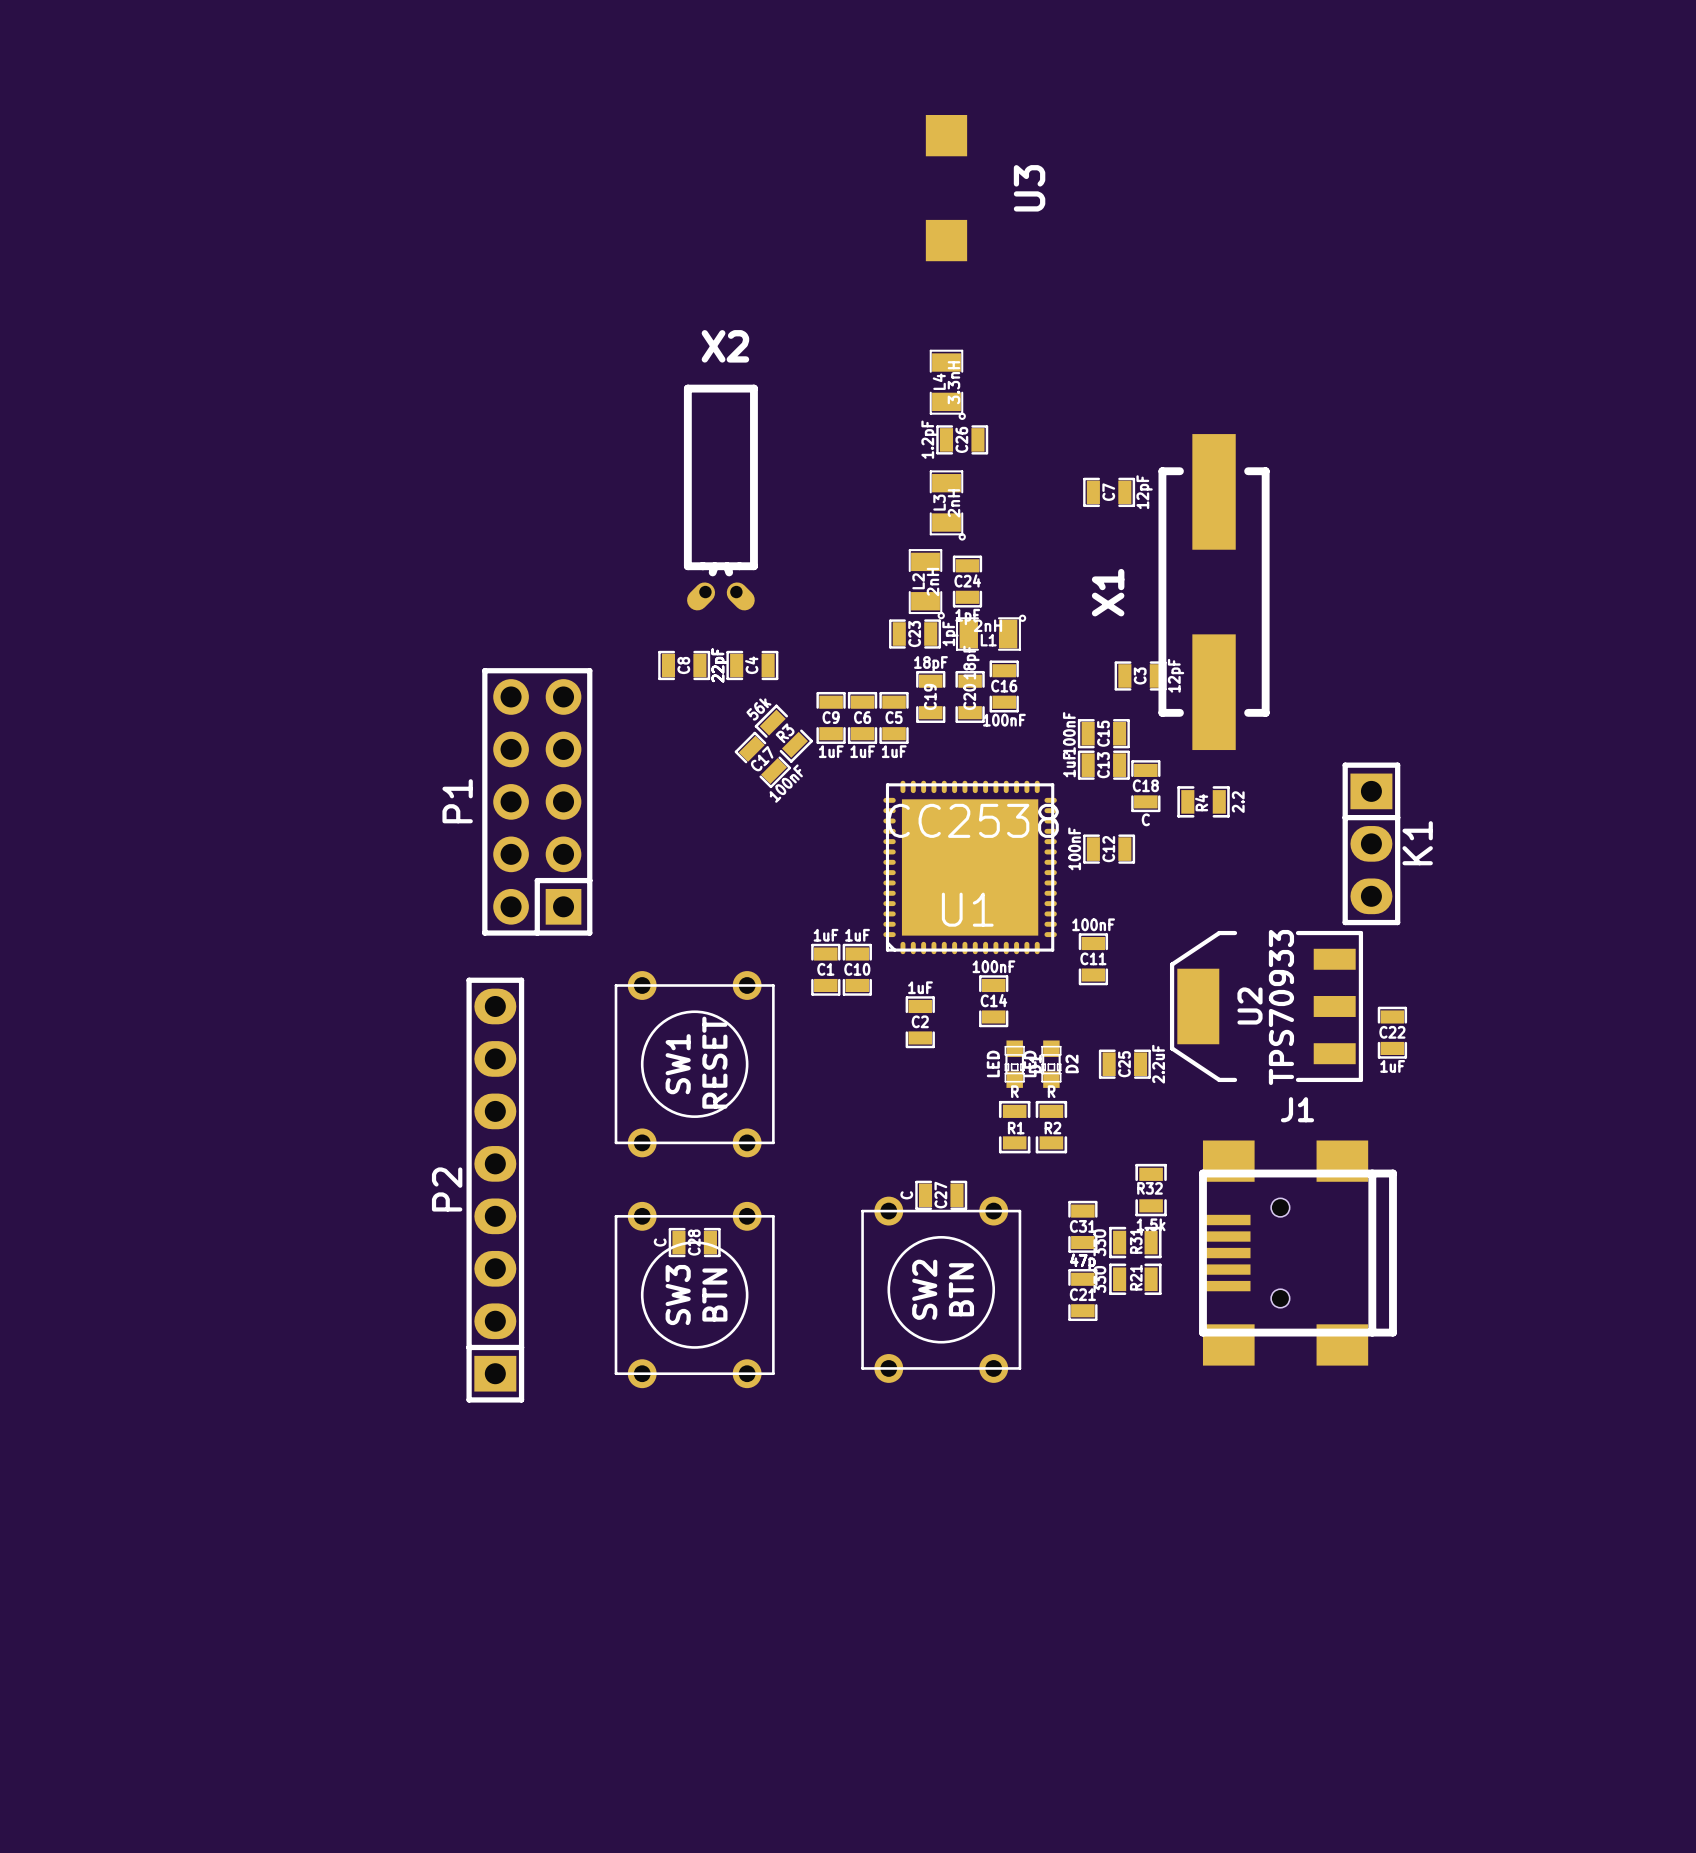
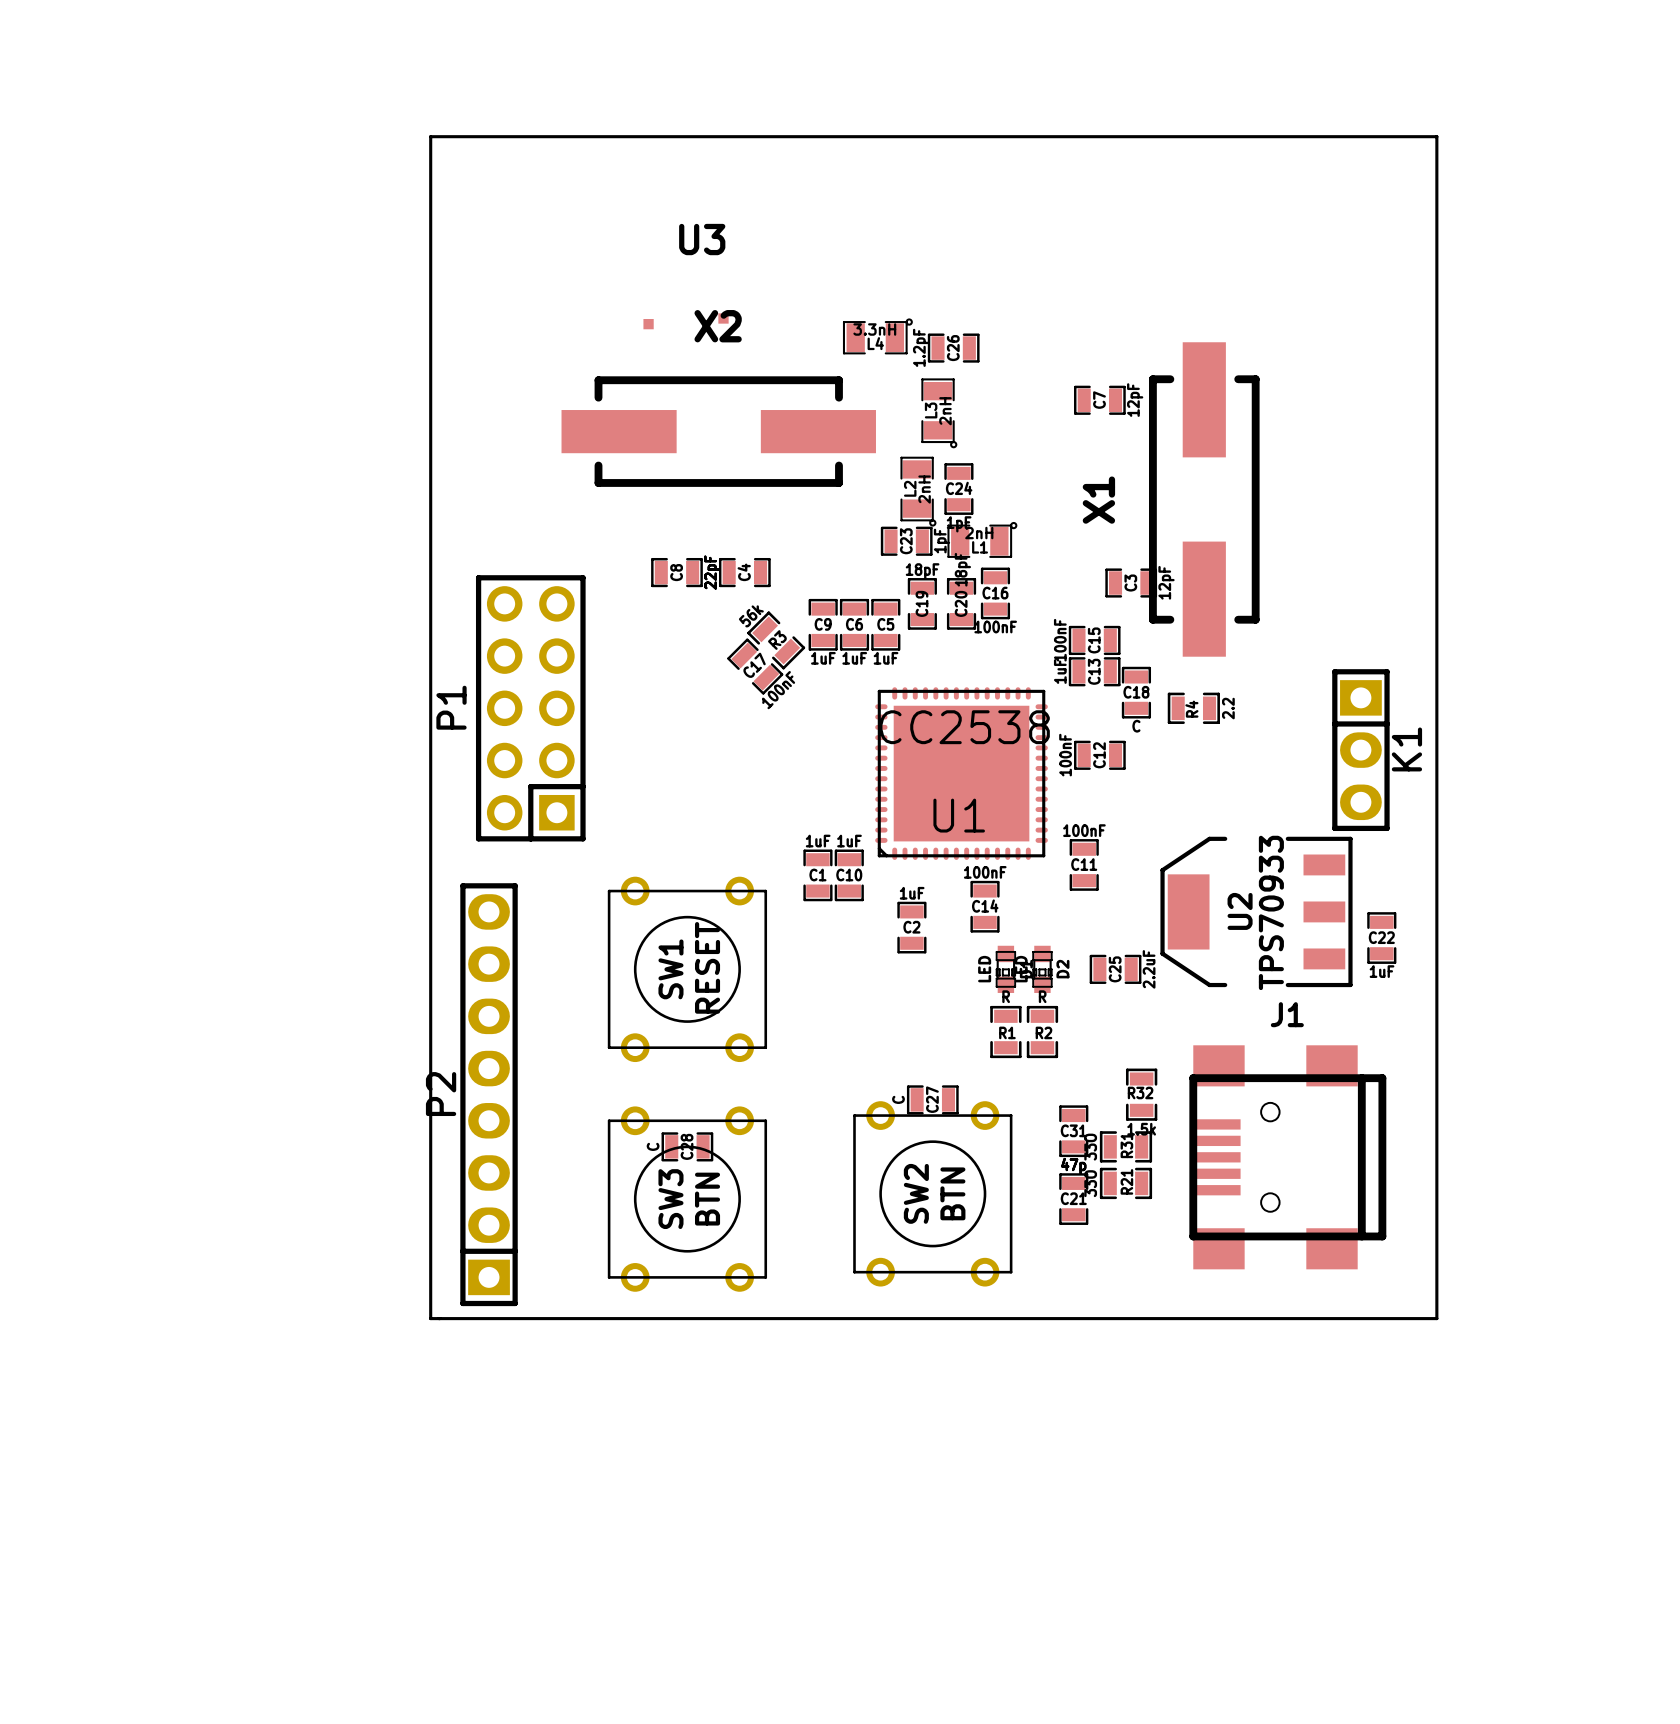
U3 footprint: [925, 114, 968, 262] -> [643, 313, 729, 330]
U3 name position: U3 (1029, 188) -> U3 (702, 239)
board edge: none -> (430, 136) (430, 1318) (1436, 1318) (1436, 136) (430, 136)
X2 name position: X2 (725, 346) -> X2 (718, 326)
X2 footprint: [683, 384, 758, 611] -> [561, 376, 876, 487]
L4 rotation: 0° (947, 384) -> 90° counterclockwise (877, 336)
L4 position: (947, 384) -> (877, 336)

